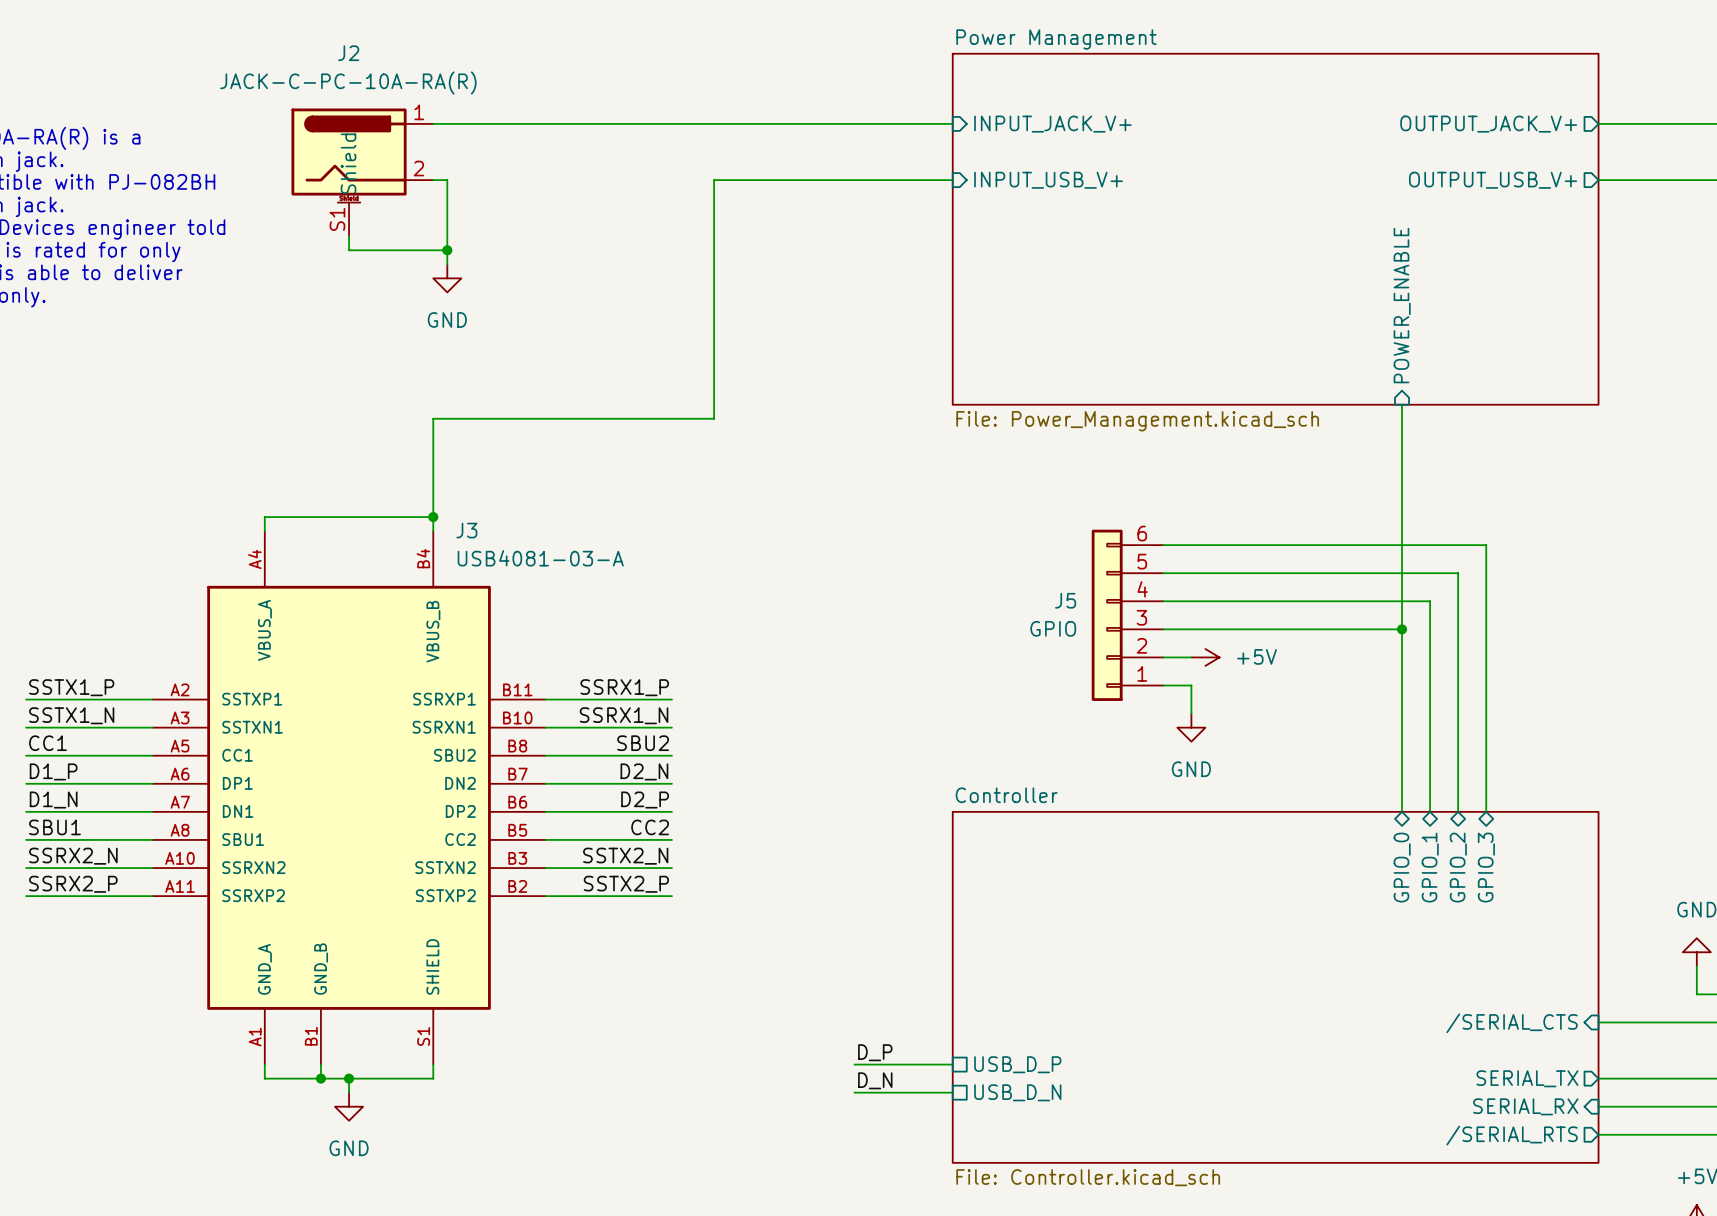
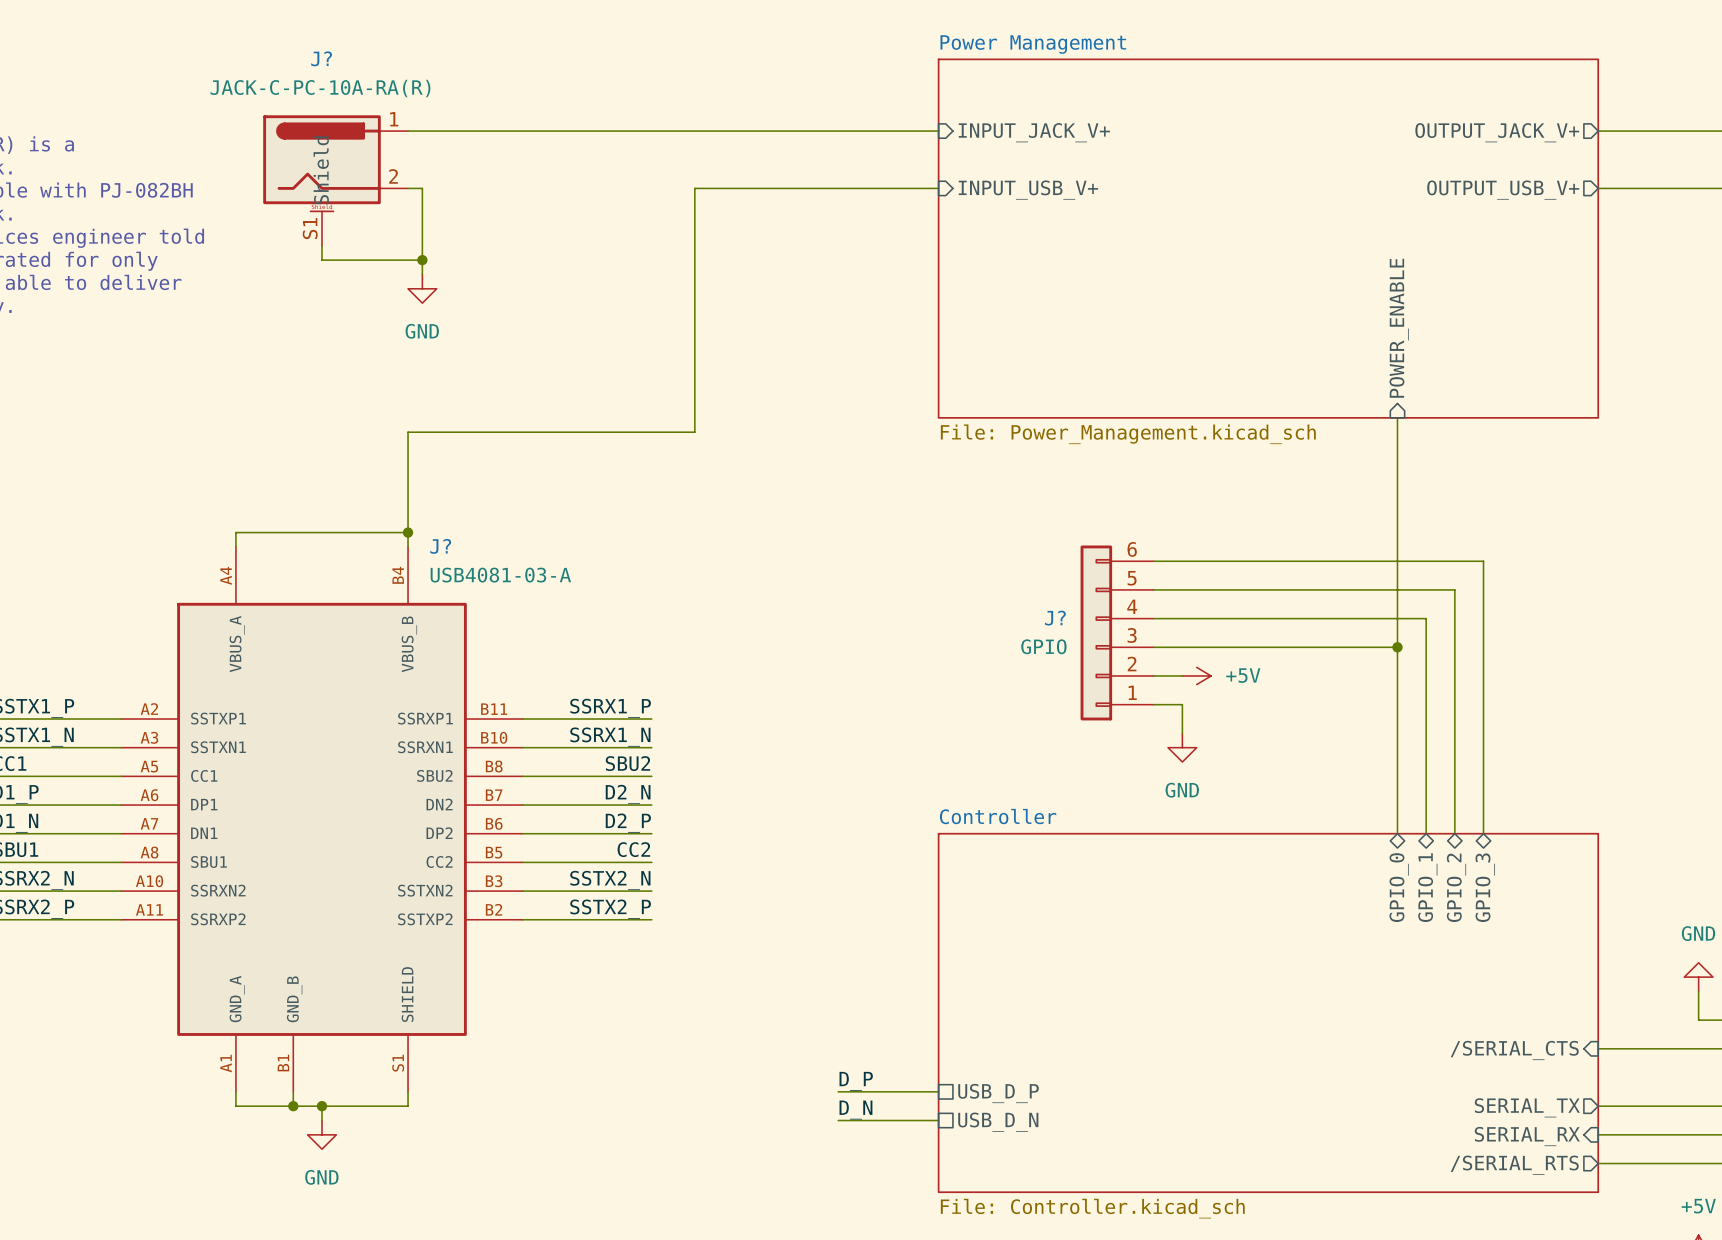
J2 name: J2 (348, 53) -> J? (321, 58)
J3 name: J3 (466, 530) -> J? (440, 546)
J5 name: J5 (1065, 600) -> J? (1055, 618)

